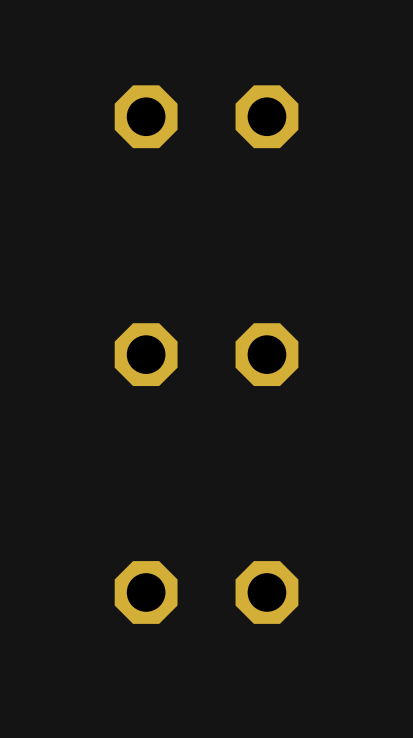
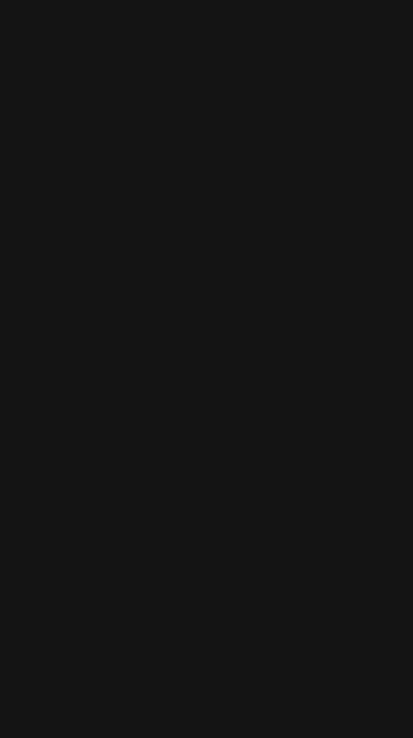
part: (206, 116) -> none
part: (206, 354) -> none
part: (206, 592) -> none

